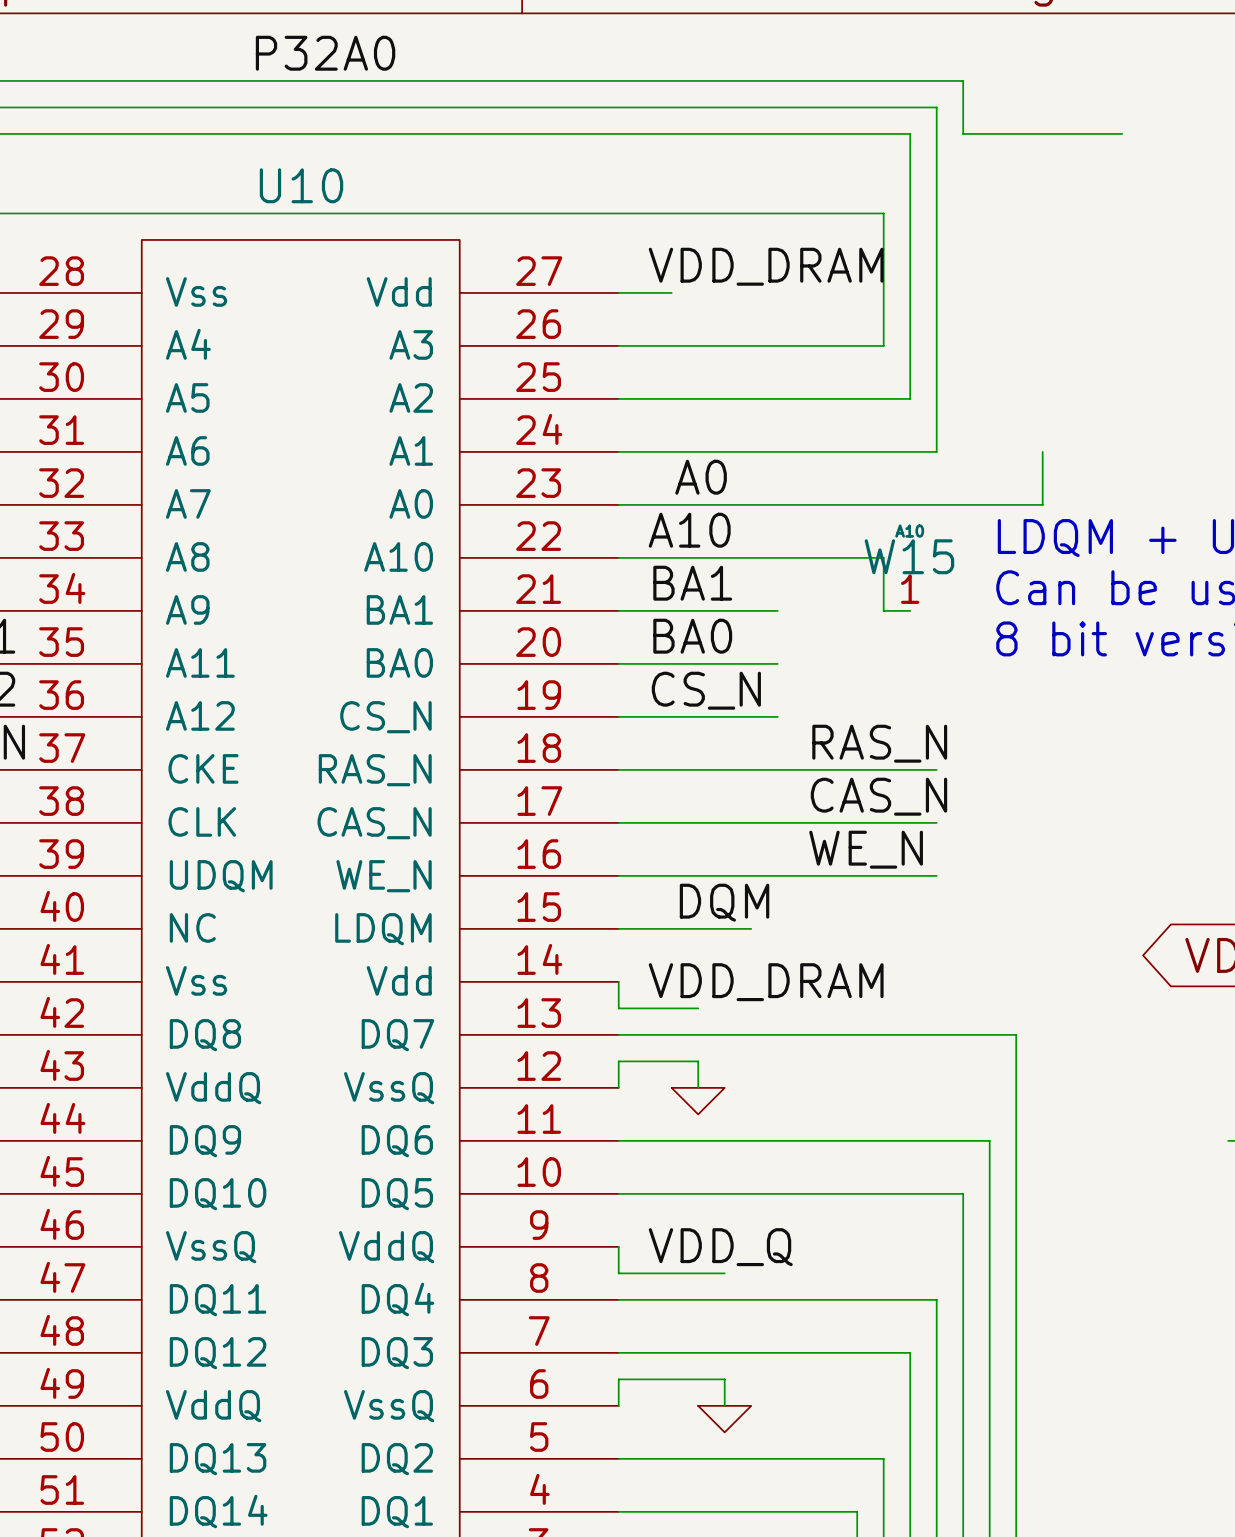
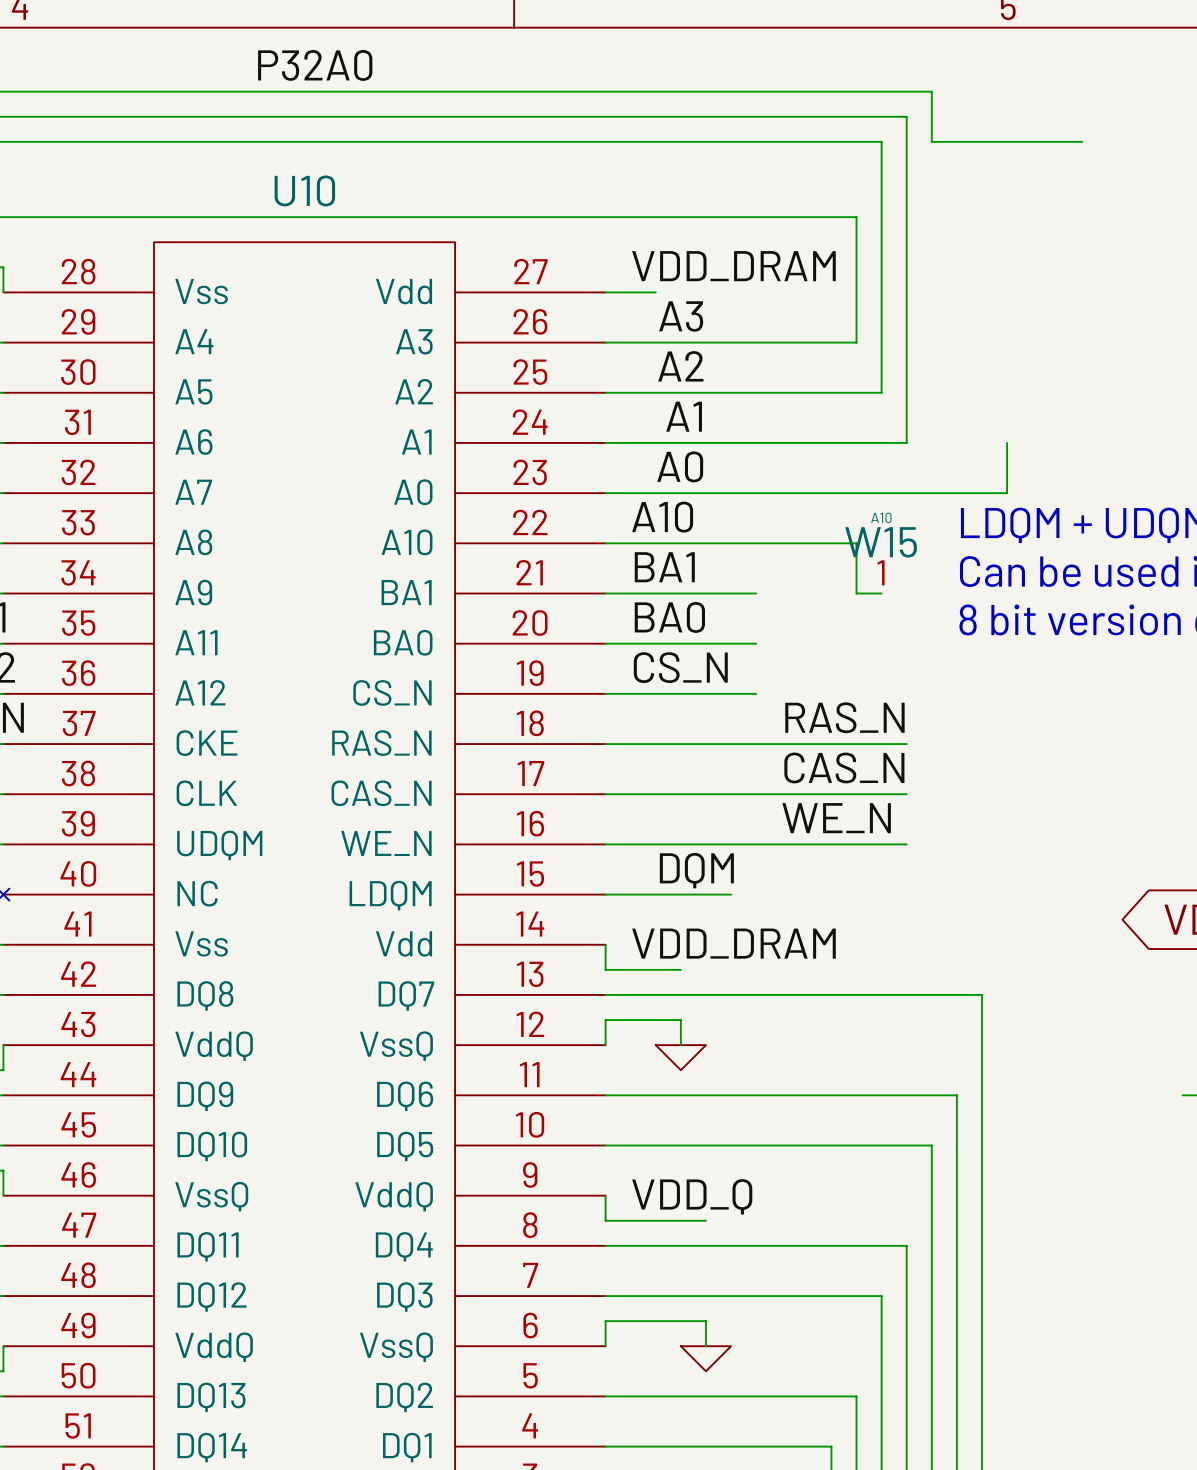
label: none -> A3 (681, 316)
label: none -> A2 (680, 366)
label: none -> A1 (684, 416)

